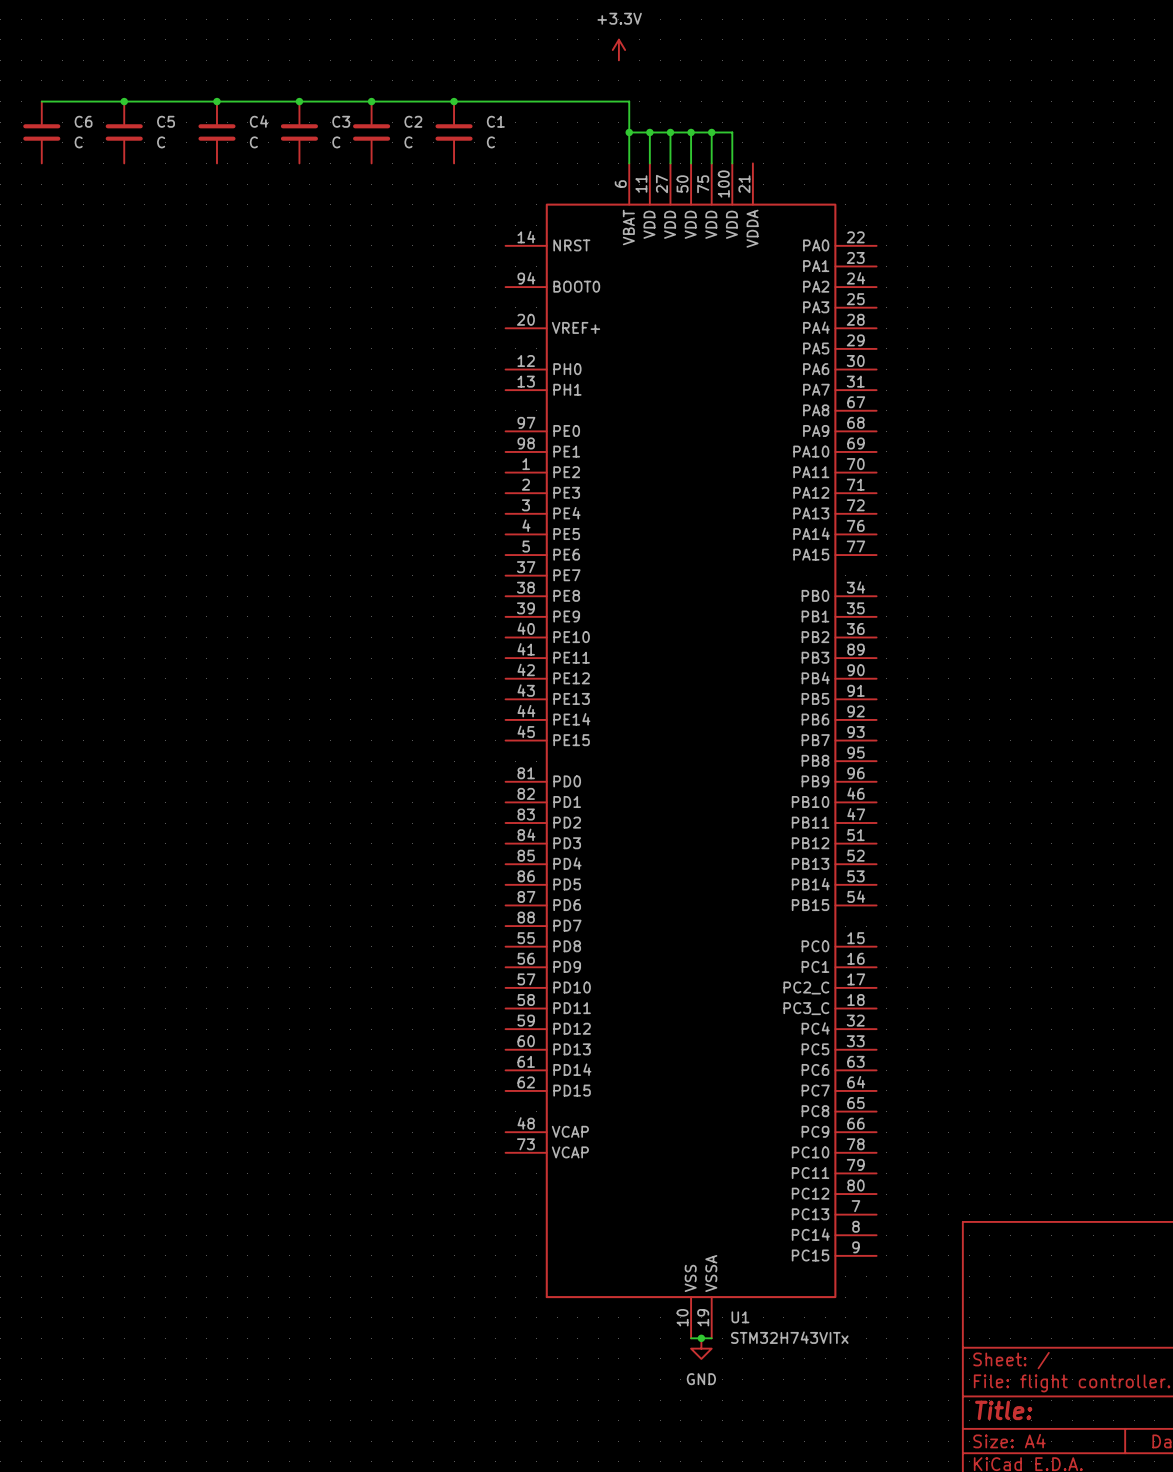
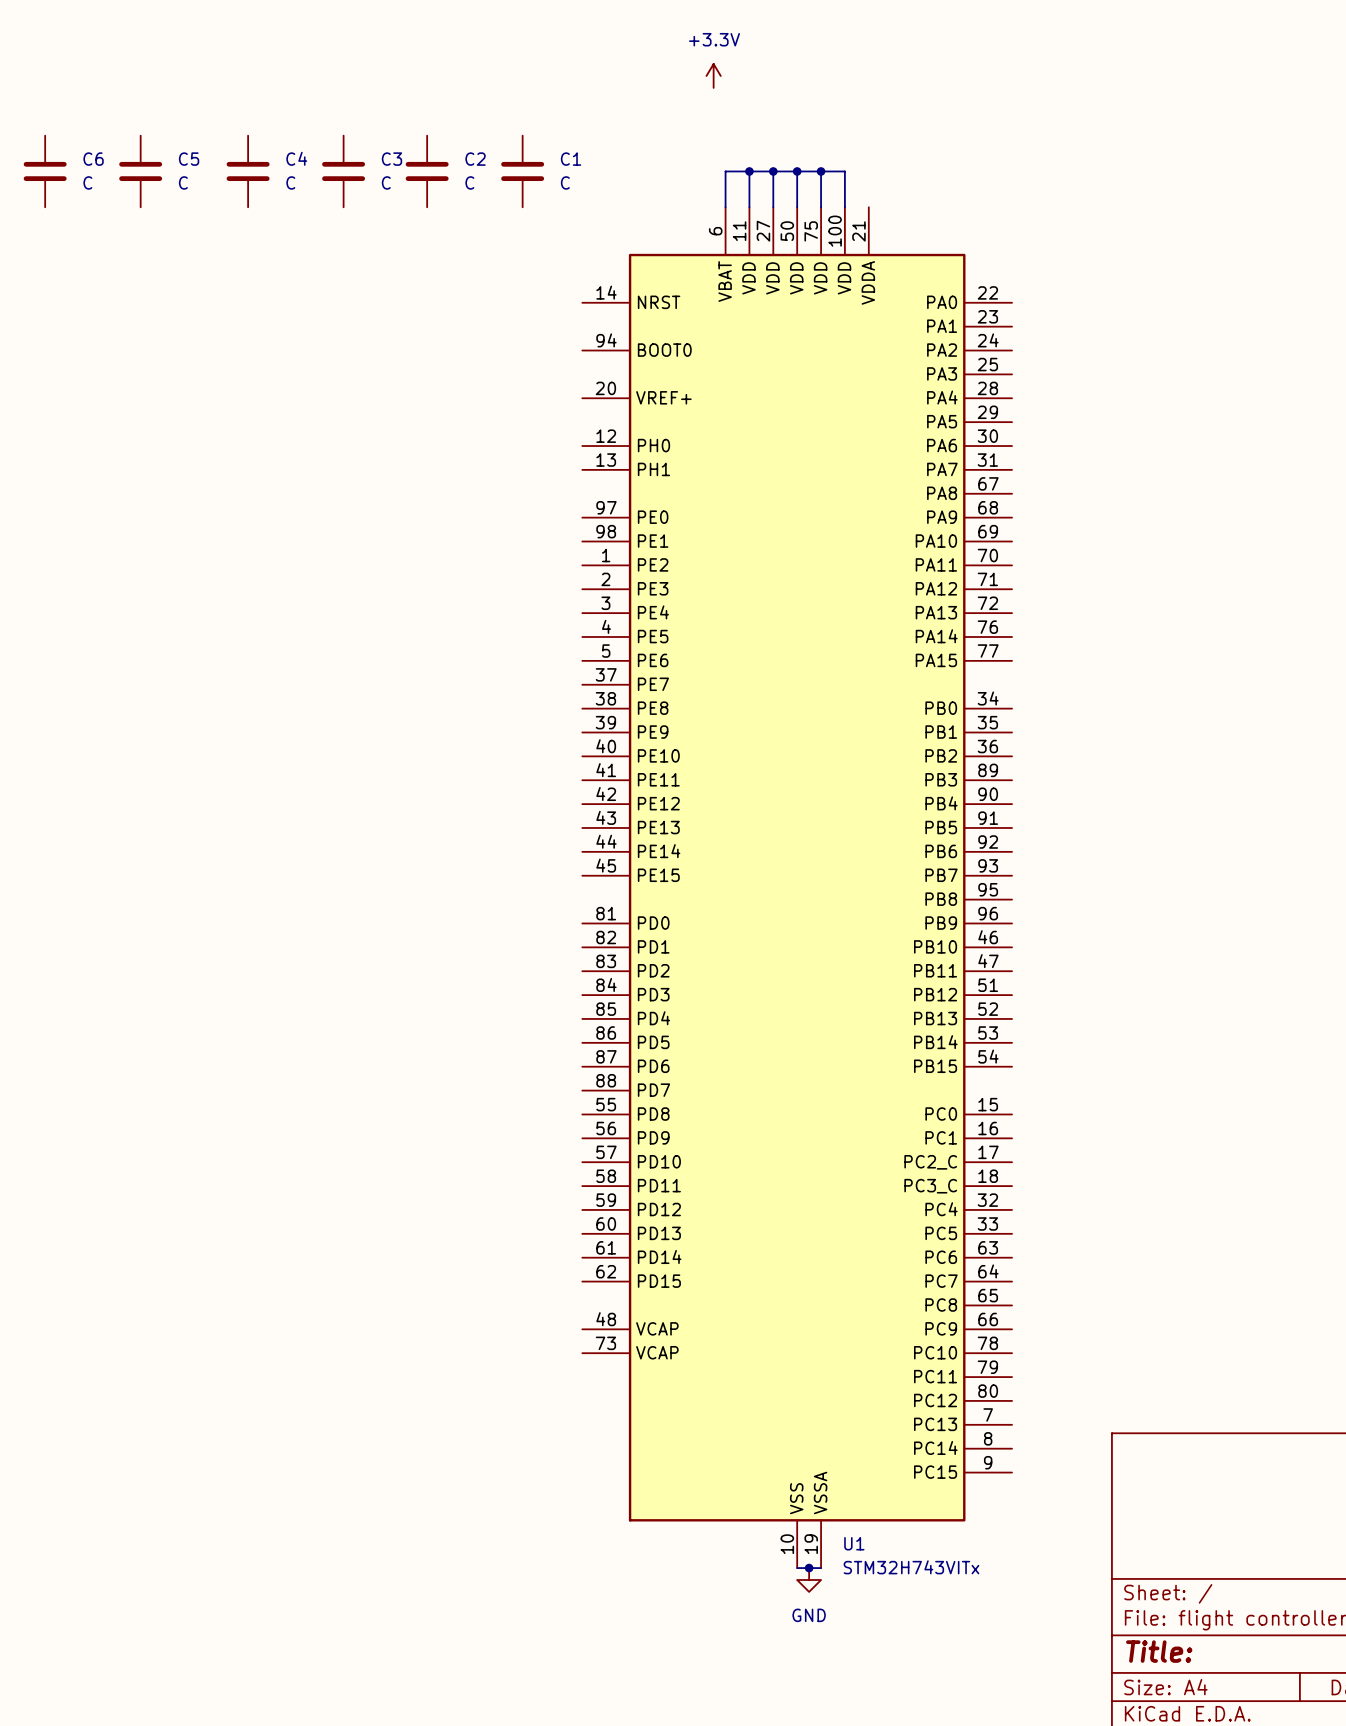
wire: (41, 101) (629, 101) (629, 132) -> none
junction: (124, 101) -> none
junction: (216, 101) -> none
junction: (299, 101) -> none
junction: (371, 101) -> none
junction: (454, 101) -> none
junction: (629, 132) -> none

